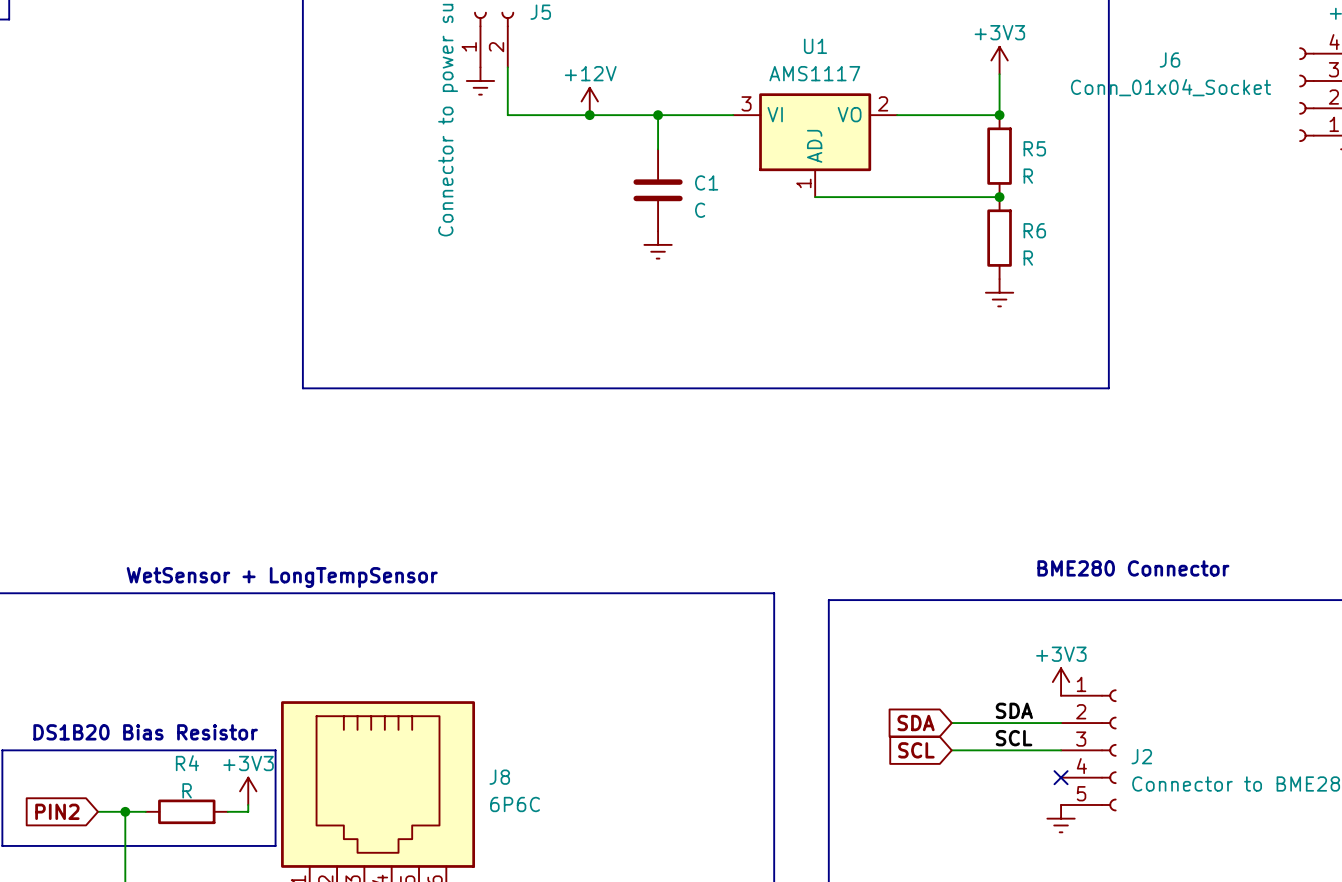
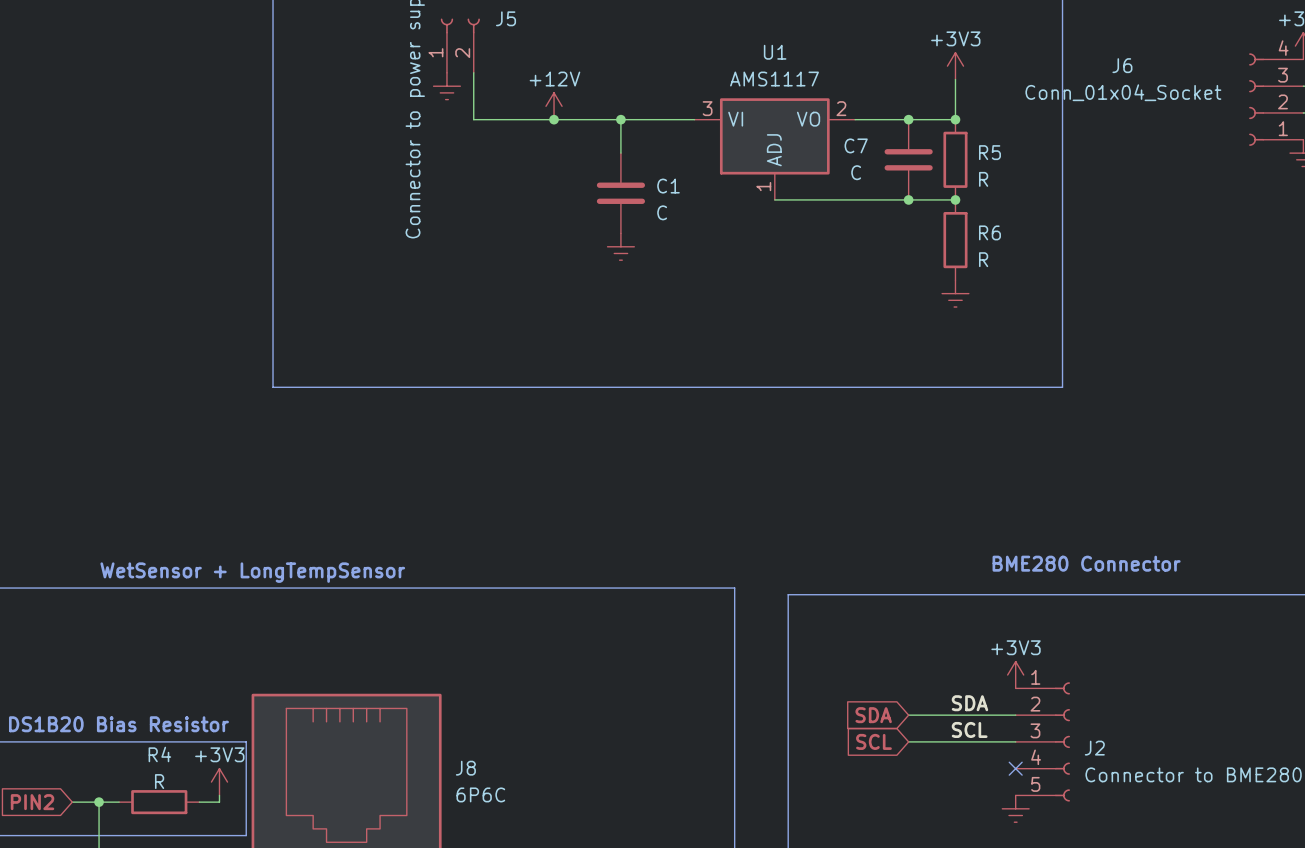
junction: none -> (908, 119)
C7: none -> C (908, 159)
junction: none -> (908, 199)

